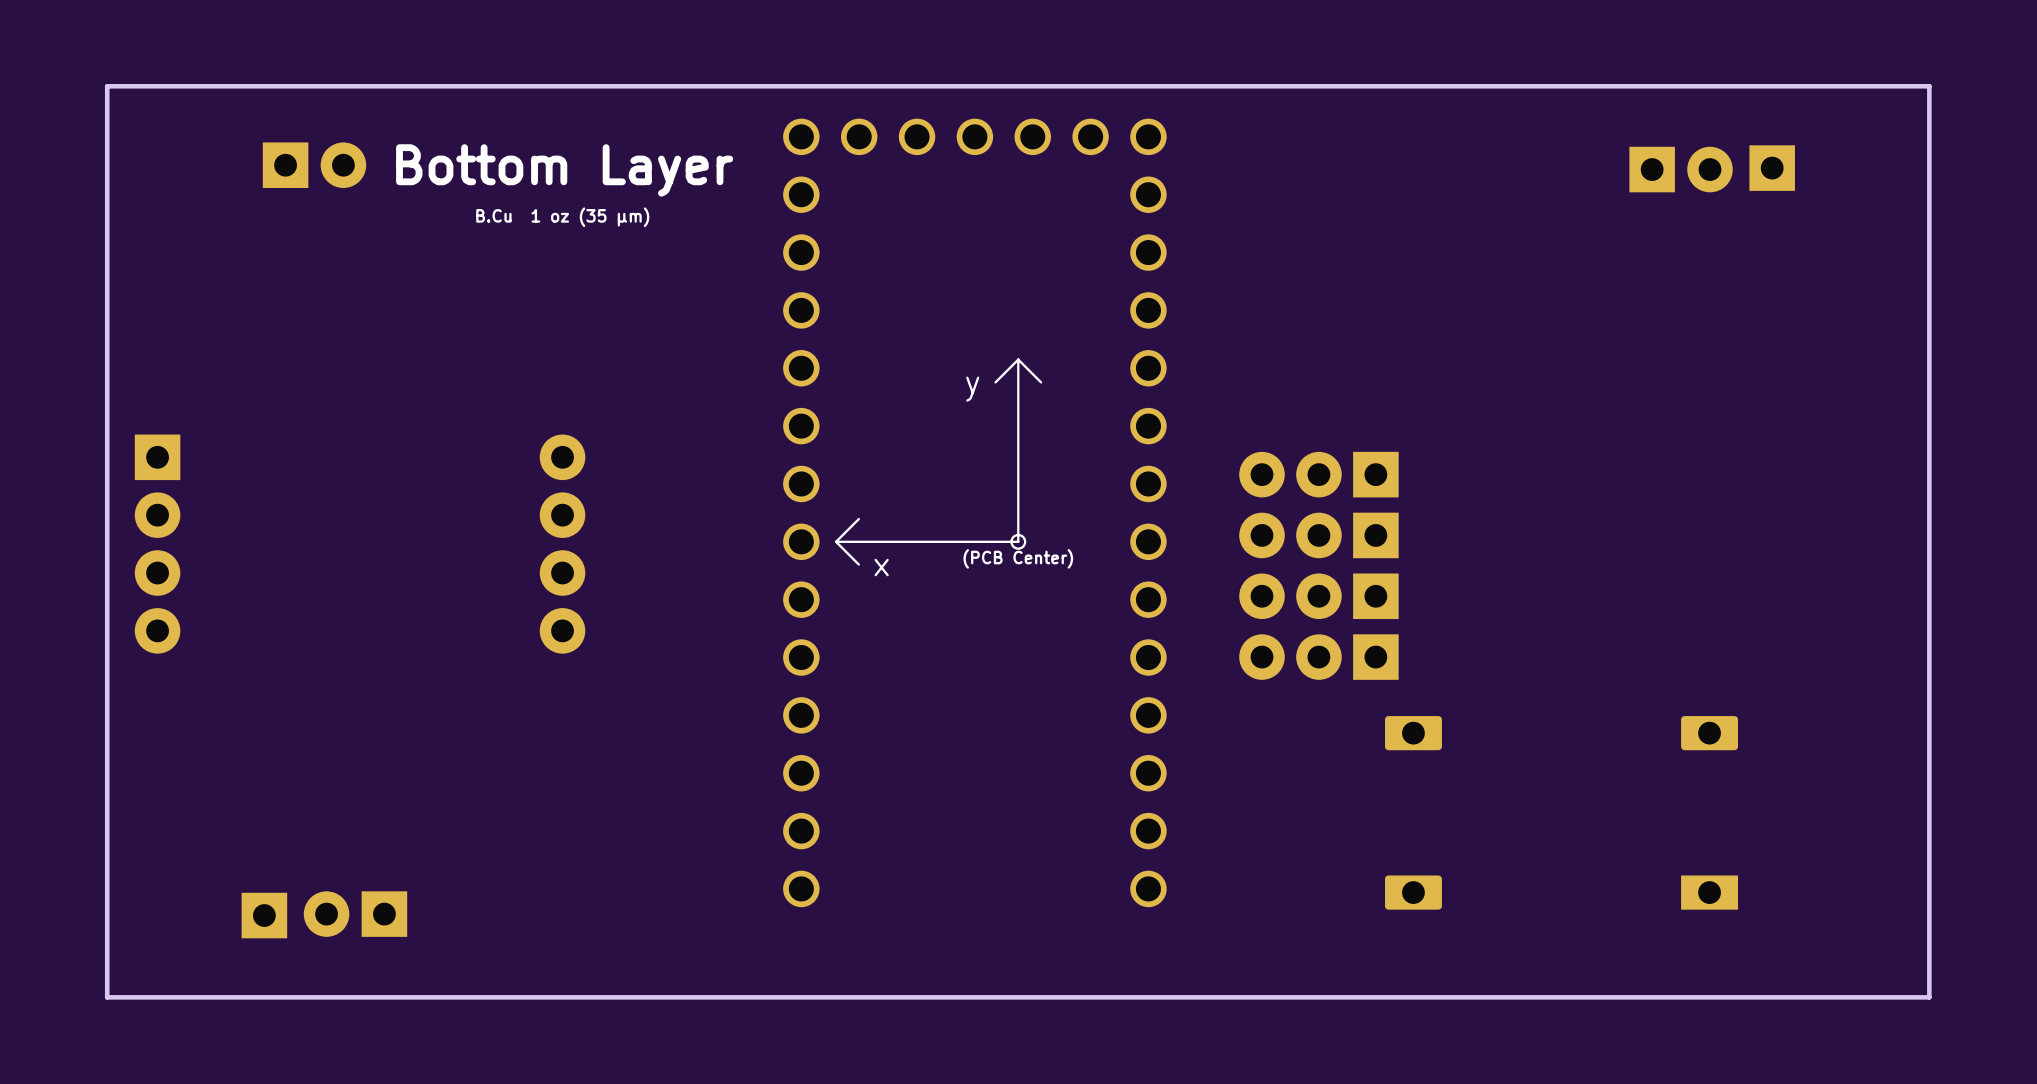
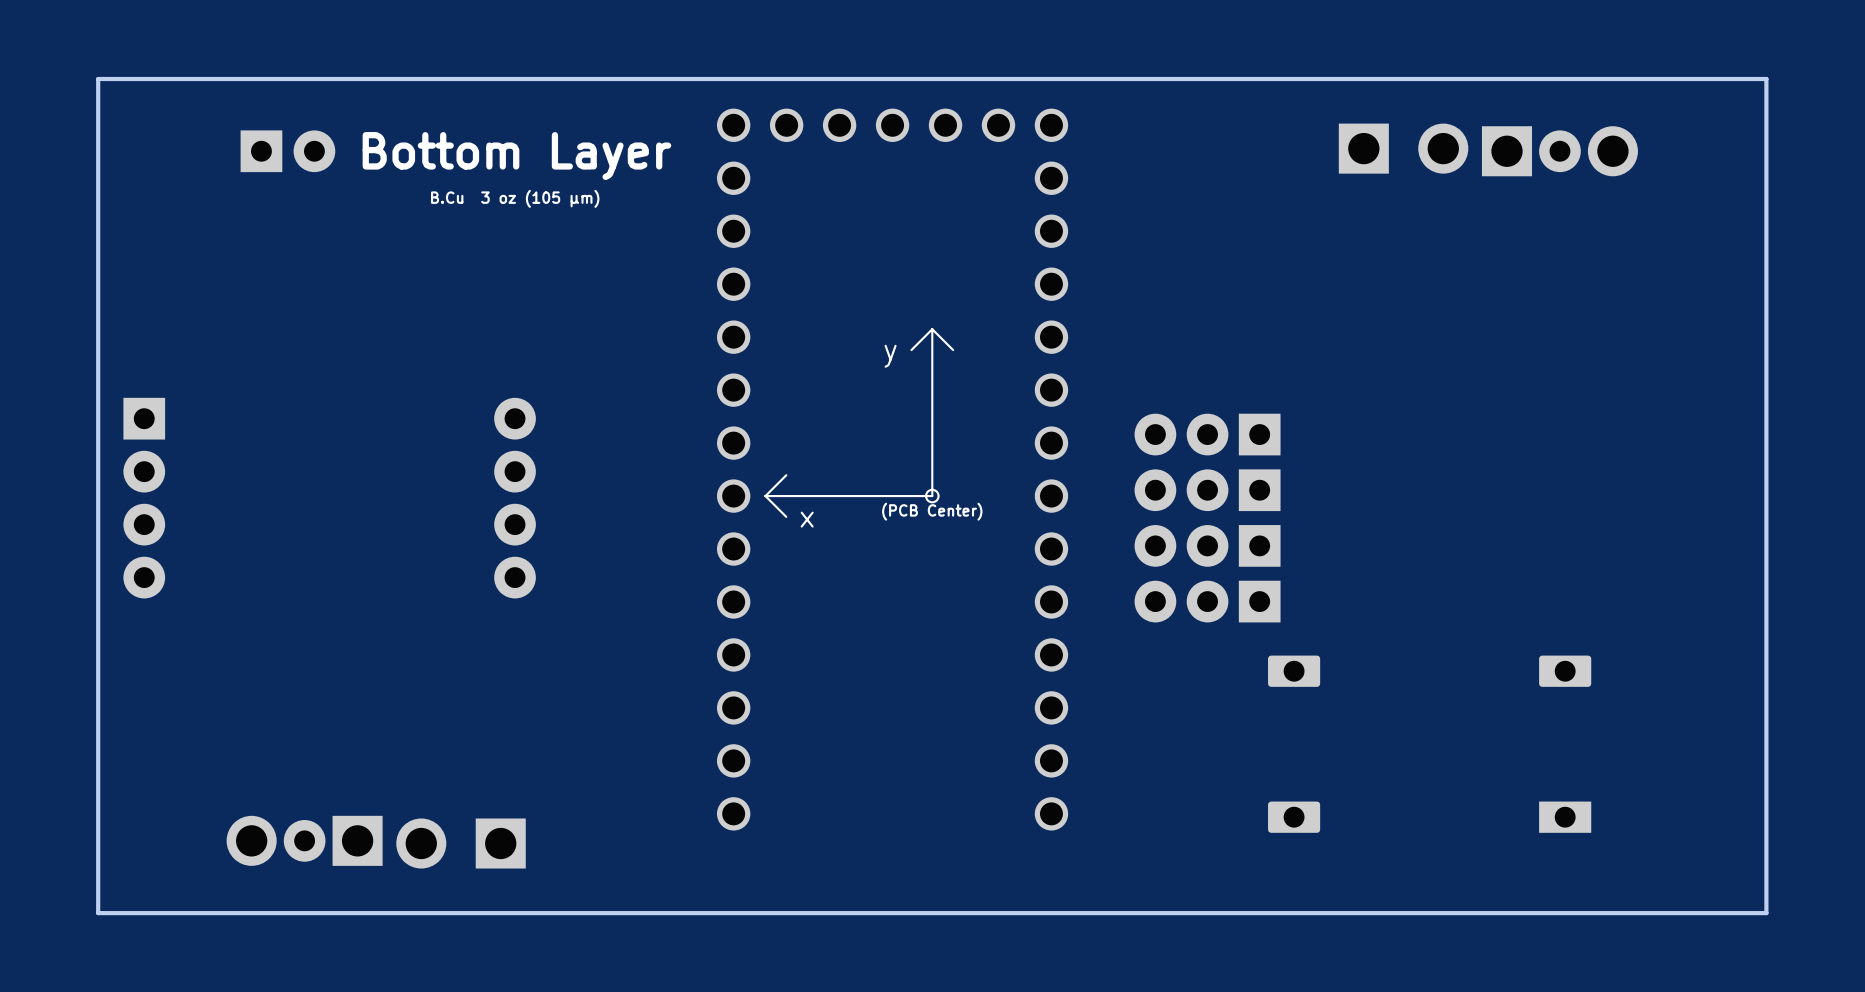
part: none -> (1403, 148)
part: none -> (1559, 151)
part: (1772, 168) -> none
part: (1681, 169) -> none
text: B.Cu 1 oz (35 μm) (562, 217) -> B.Cu 3 oz (105 μm) (515, 198)
part: (355, 914) -> none
part: (264, 915) -> none
part: none -> (304, 840)
part: none -> (461, 843)

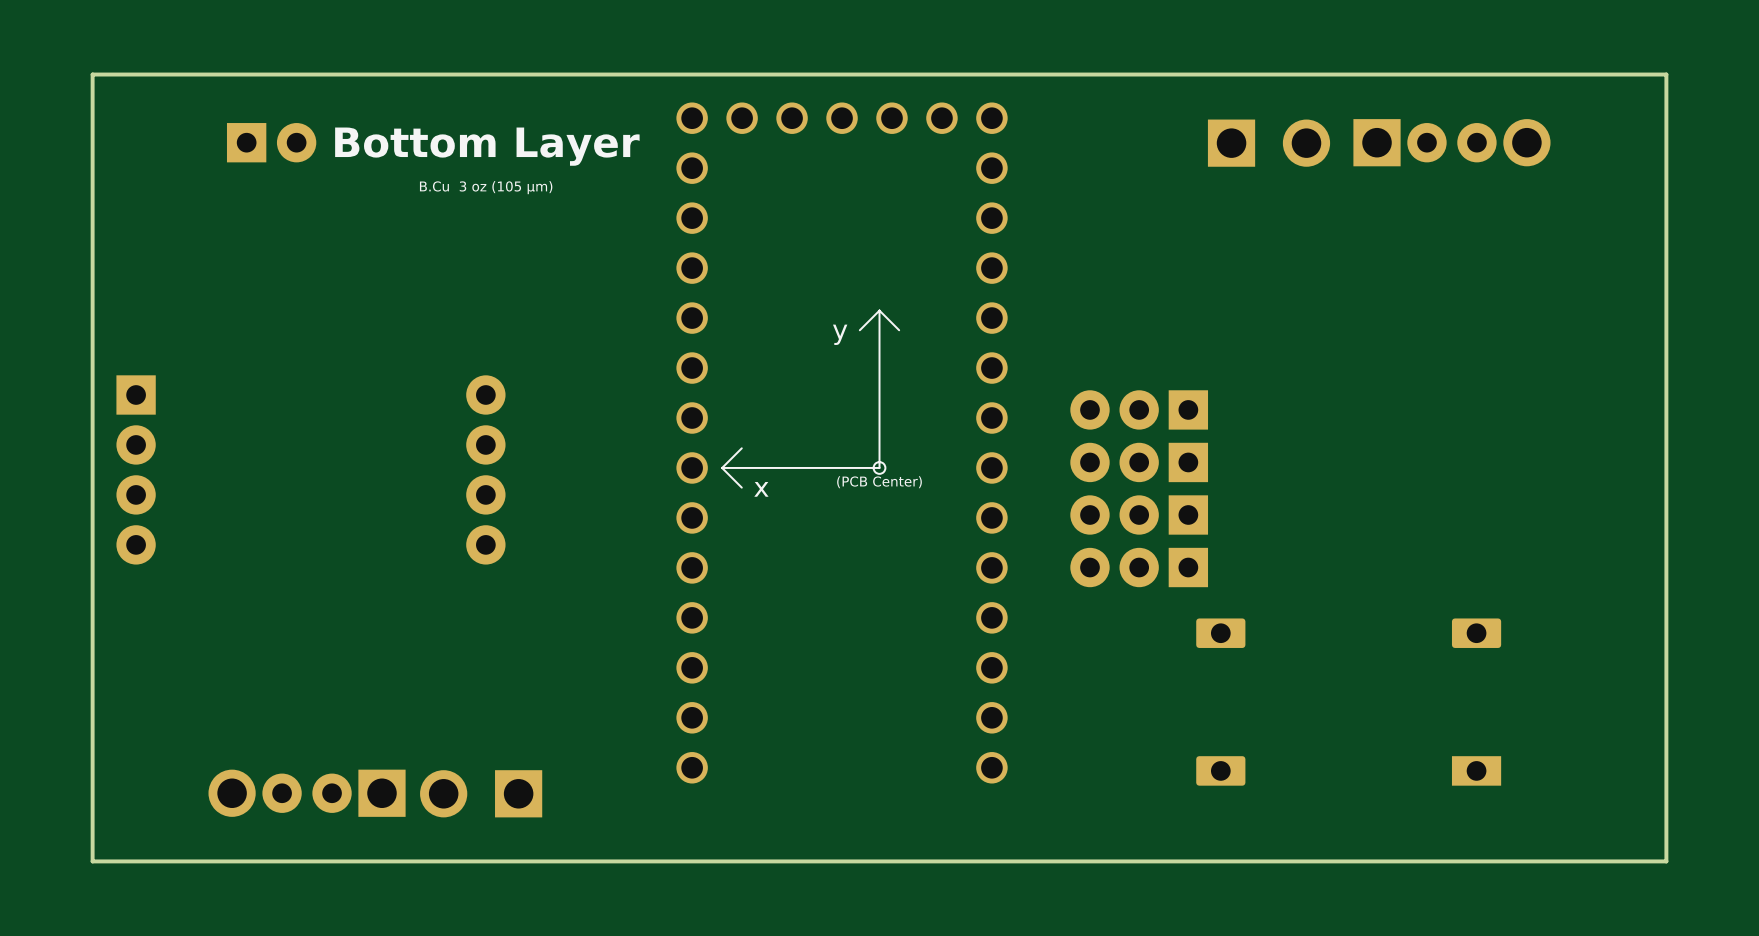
part footprint: [1481, 126, 1638, 177] -> [1353, 119, 1551, 167]
part position: (1403, 148) -> (1269, 143)
part footprint: [226, 815, 383, 866] -> [208, 769, 406, 817]
part position: (461, 843) -> (481, 793)

